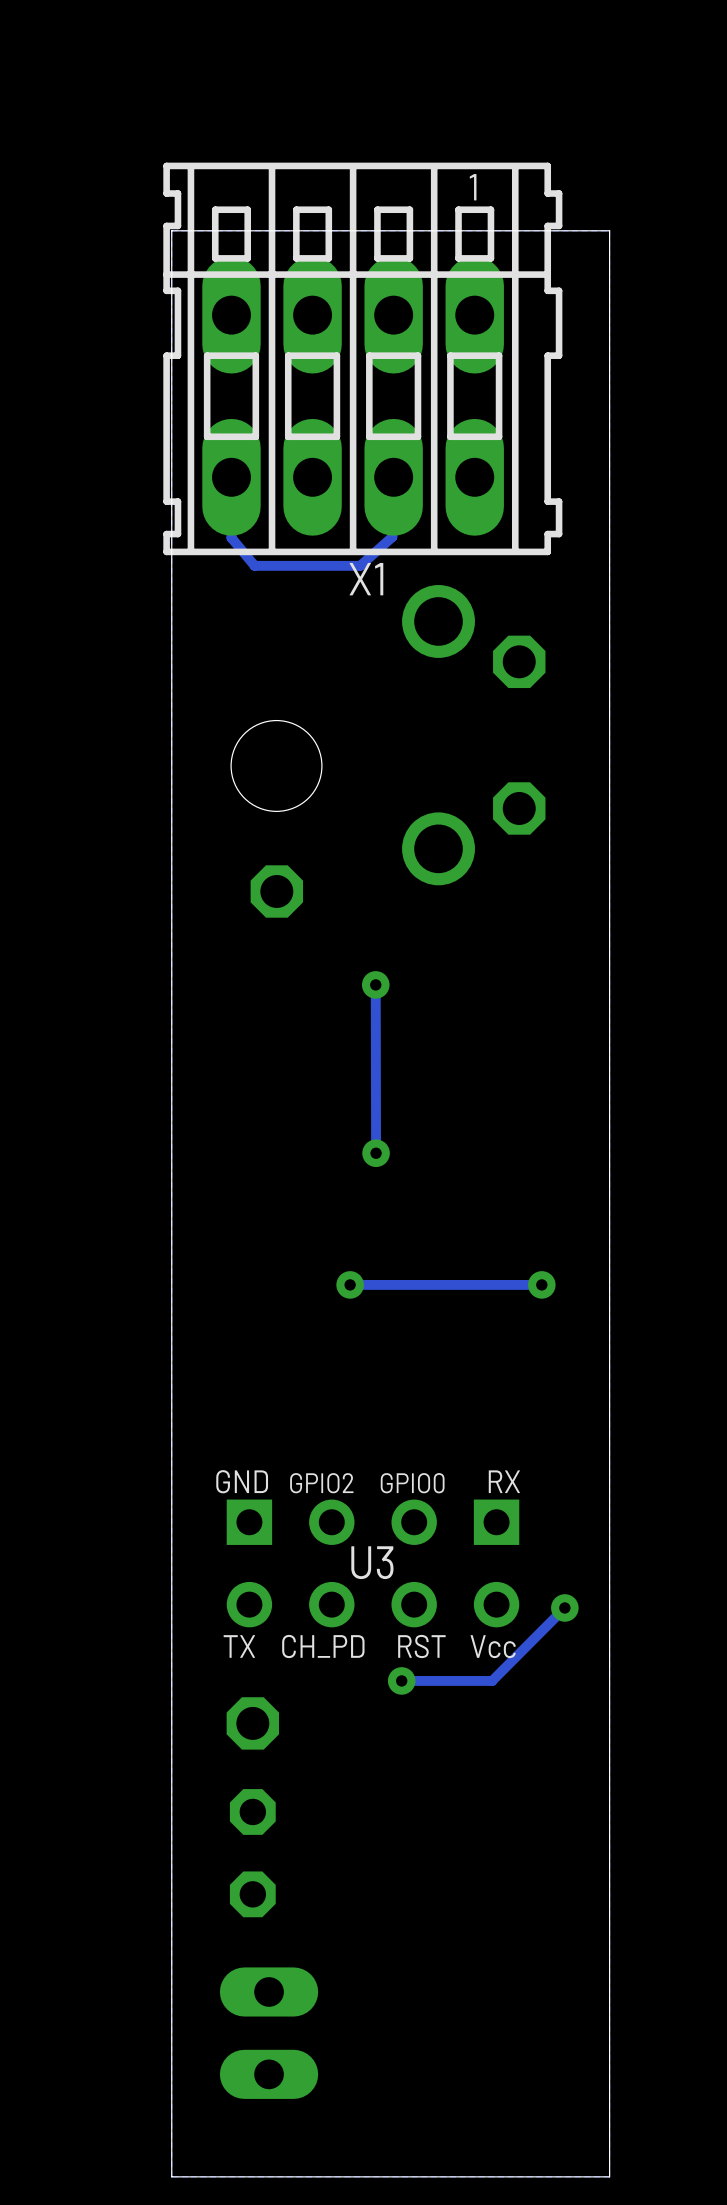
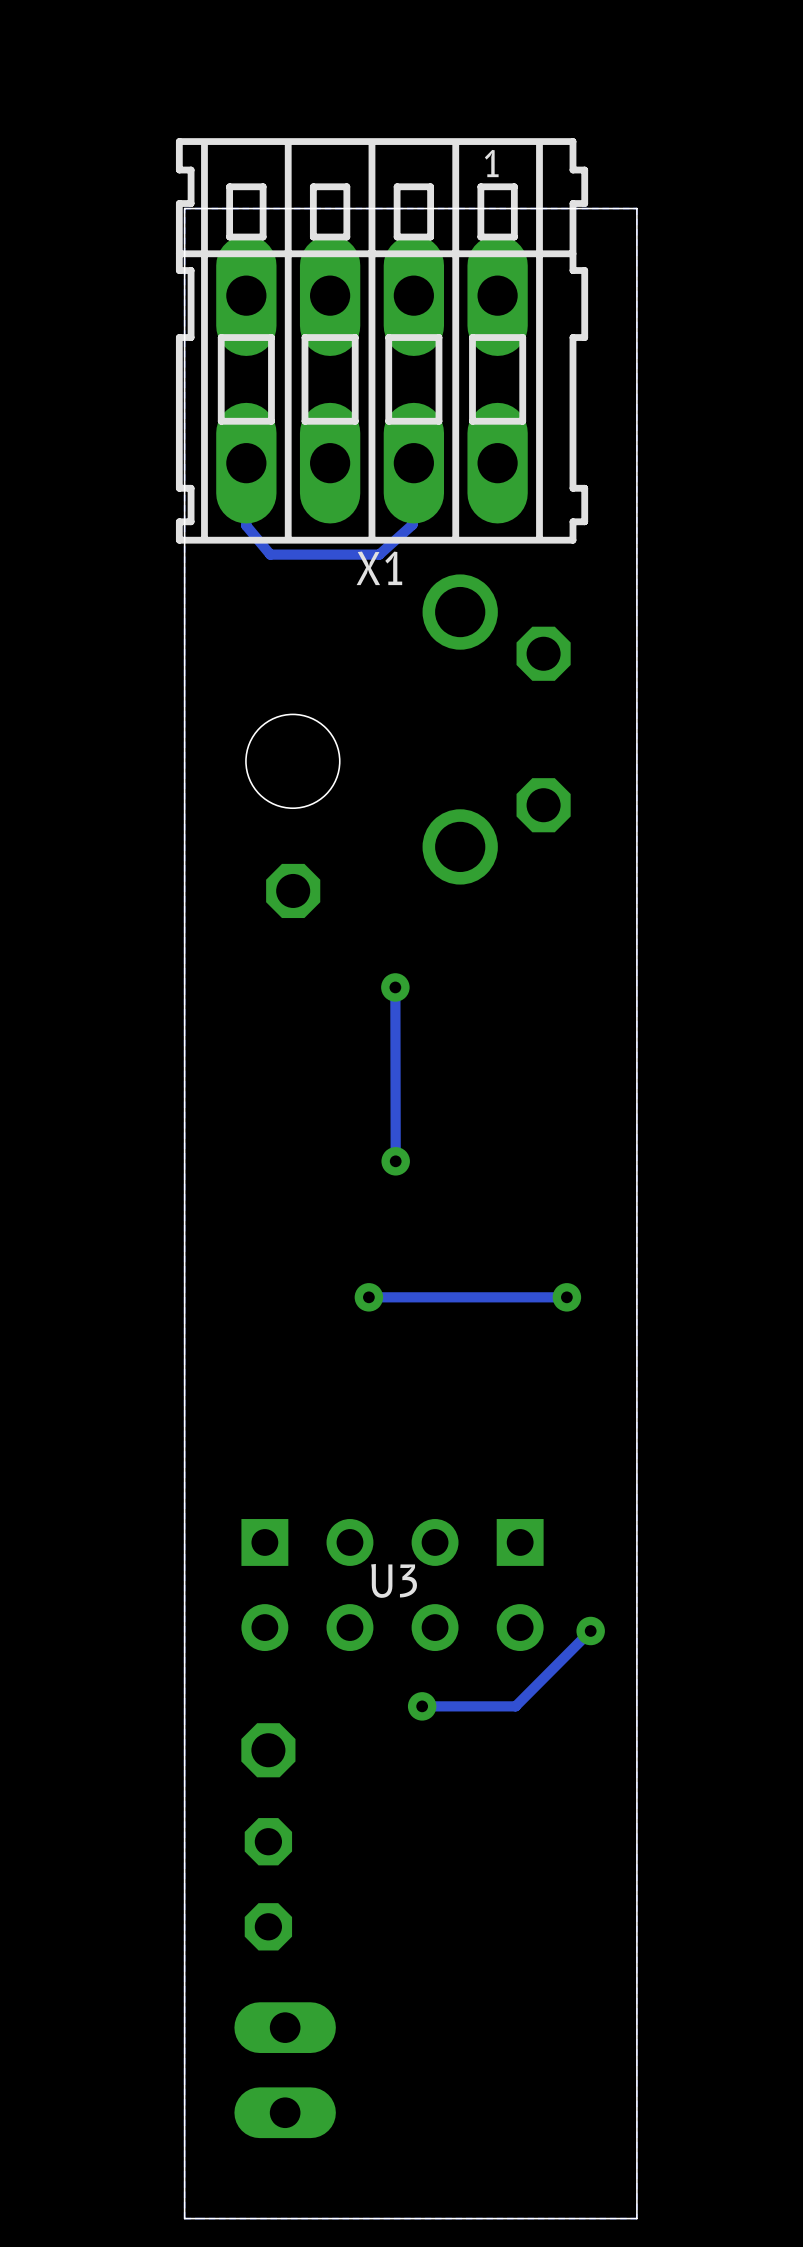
text: GND (242, 1481) -> none
text: RX (504, 1481) -> none
text: GPIO2 (321, 1483) -> none
text: GPIO0 (412, 1483) -> none
U3 name: none -> U3 (394, 1580)
text: U3 (372, 1562) -> none
text: TX (239, 1646) -> none
text: CH_PD (323, 1646) -> none
text: RST (421, 1646) -> none
text: Vcc (493, 1646) -> none

